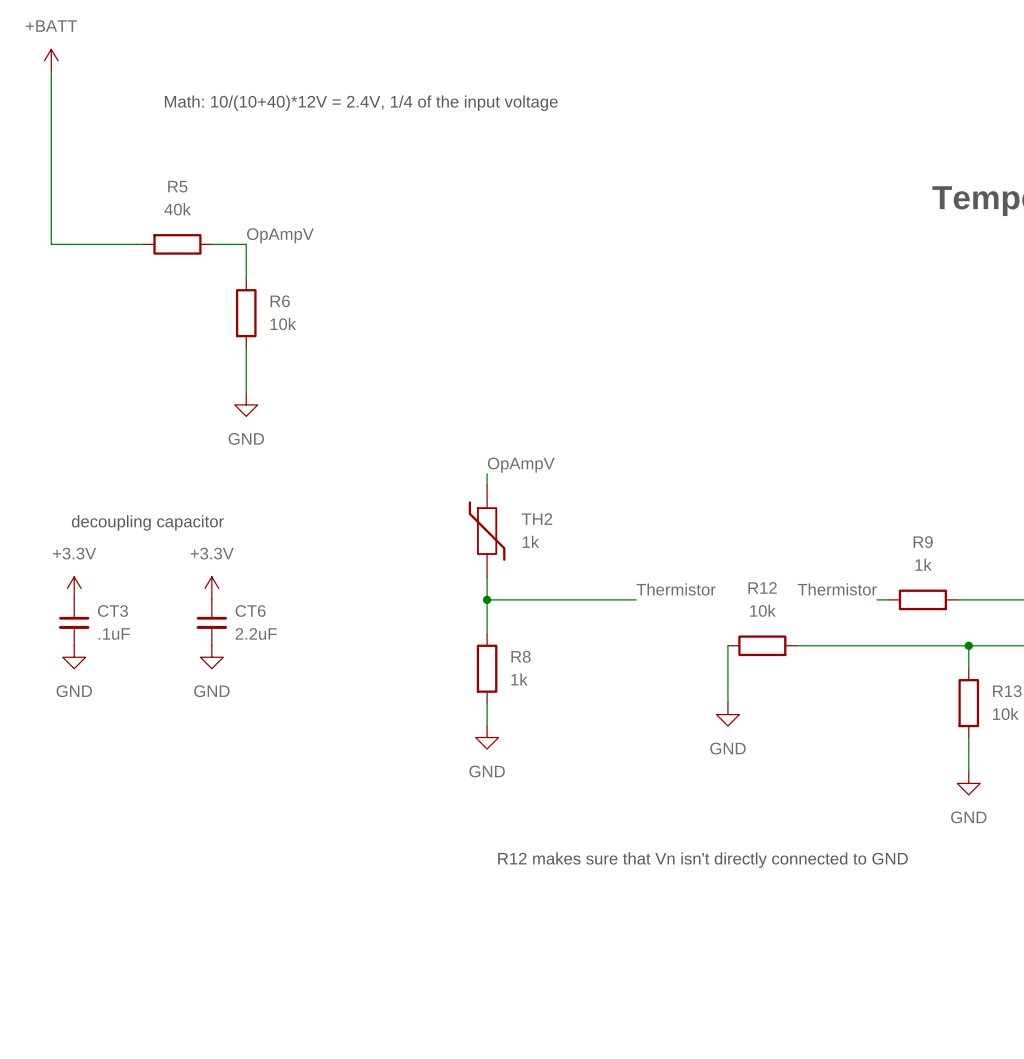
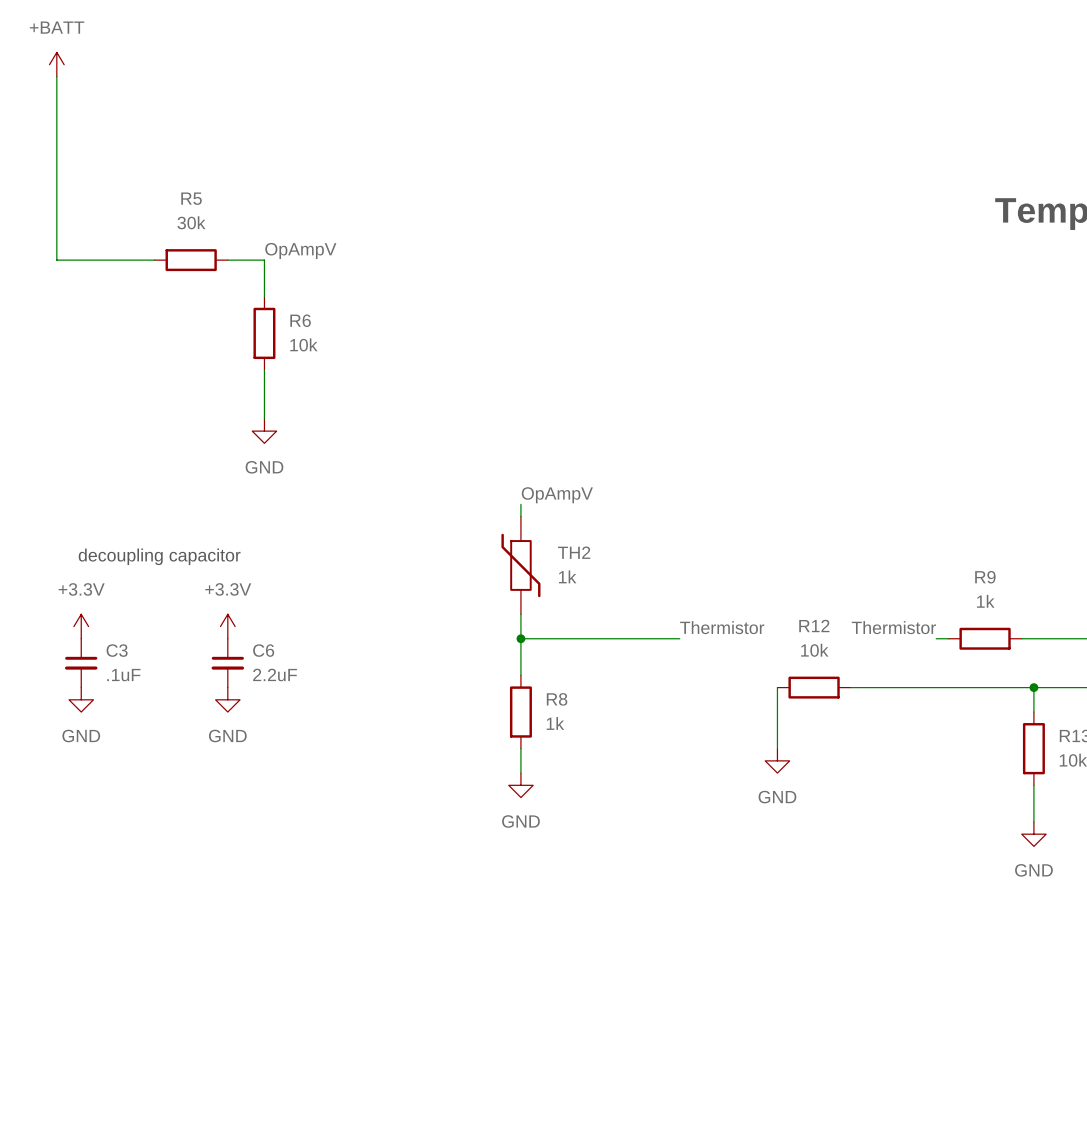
text: Math: 10/(10+40)*12V = 2.4V, 1/4 of the input voltage (361, 103) -> none
R5 value: 40k (177, 209) -> 30k (191, 222)
CT3 name: CT3 (112, 610) -> C3 (117, 650)
CT6 name: CT6 (250, 610) -> C6 (263, 650)
text: R12 makes sure that Vn isn't directly connected to GND (702, 860) -> none

